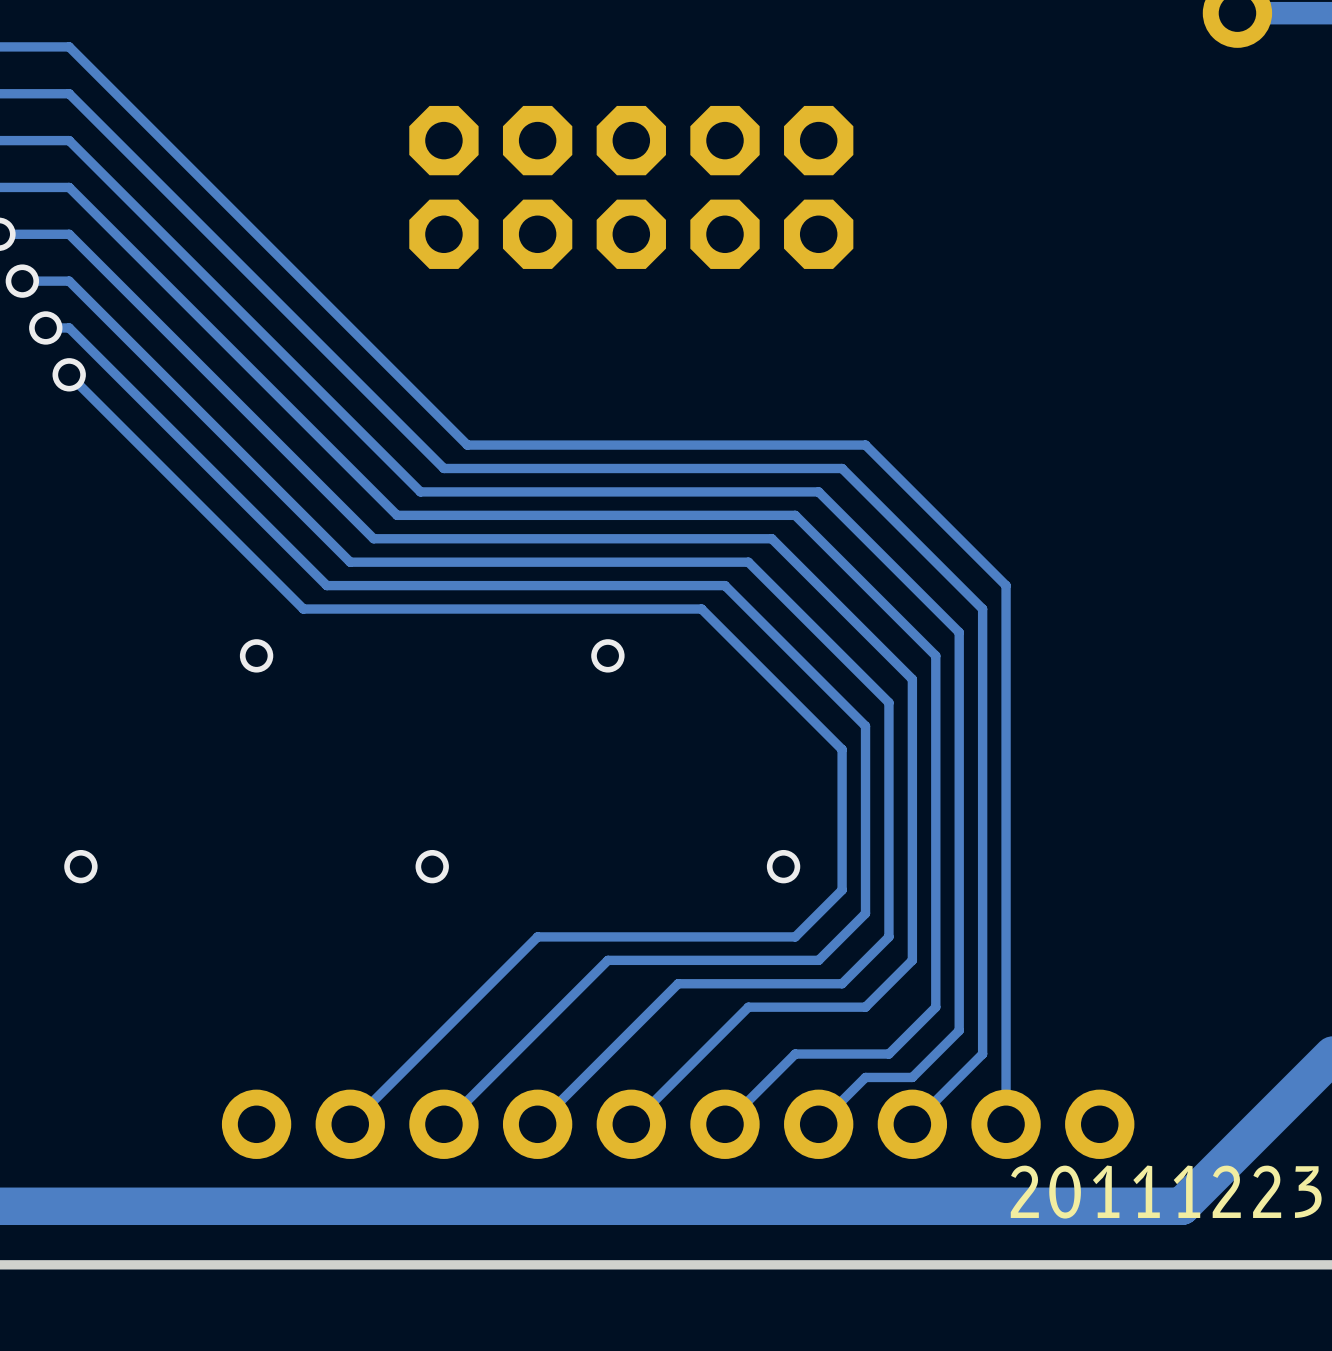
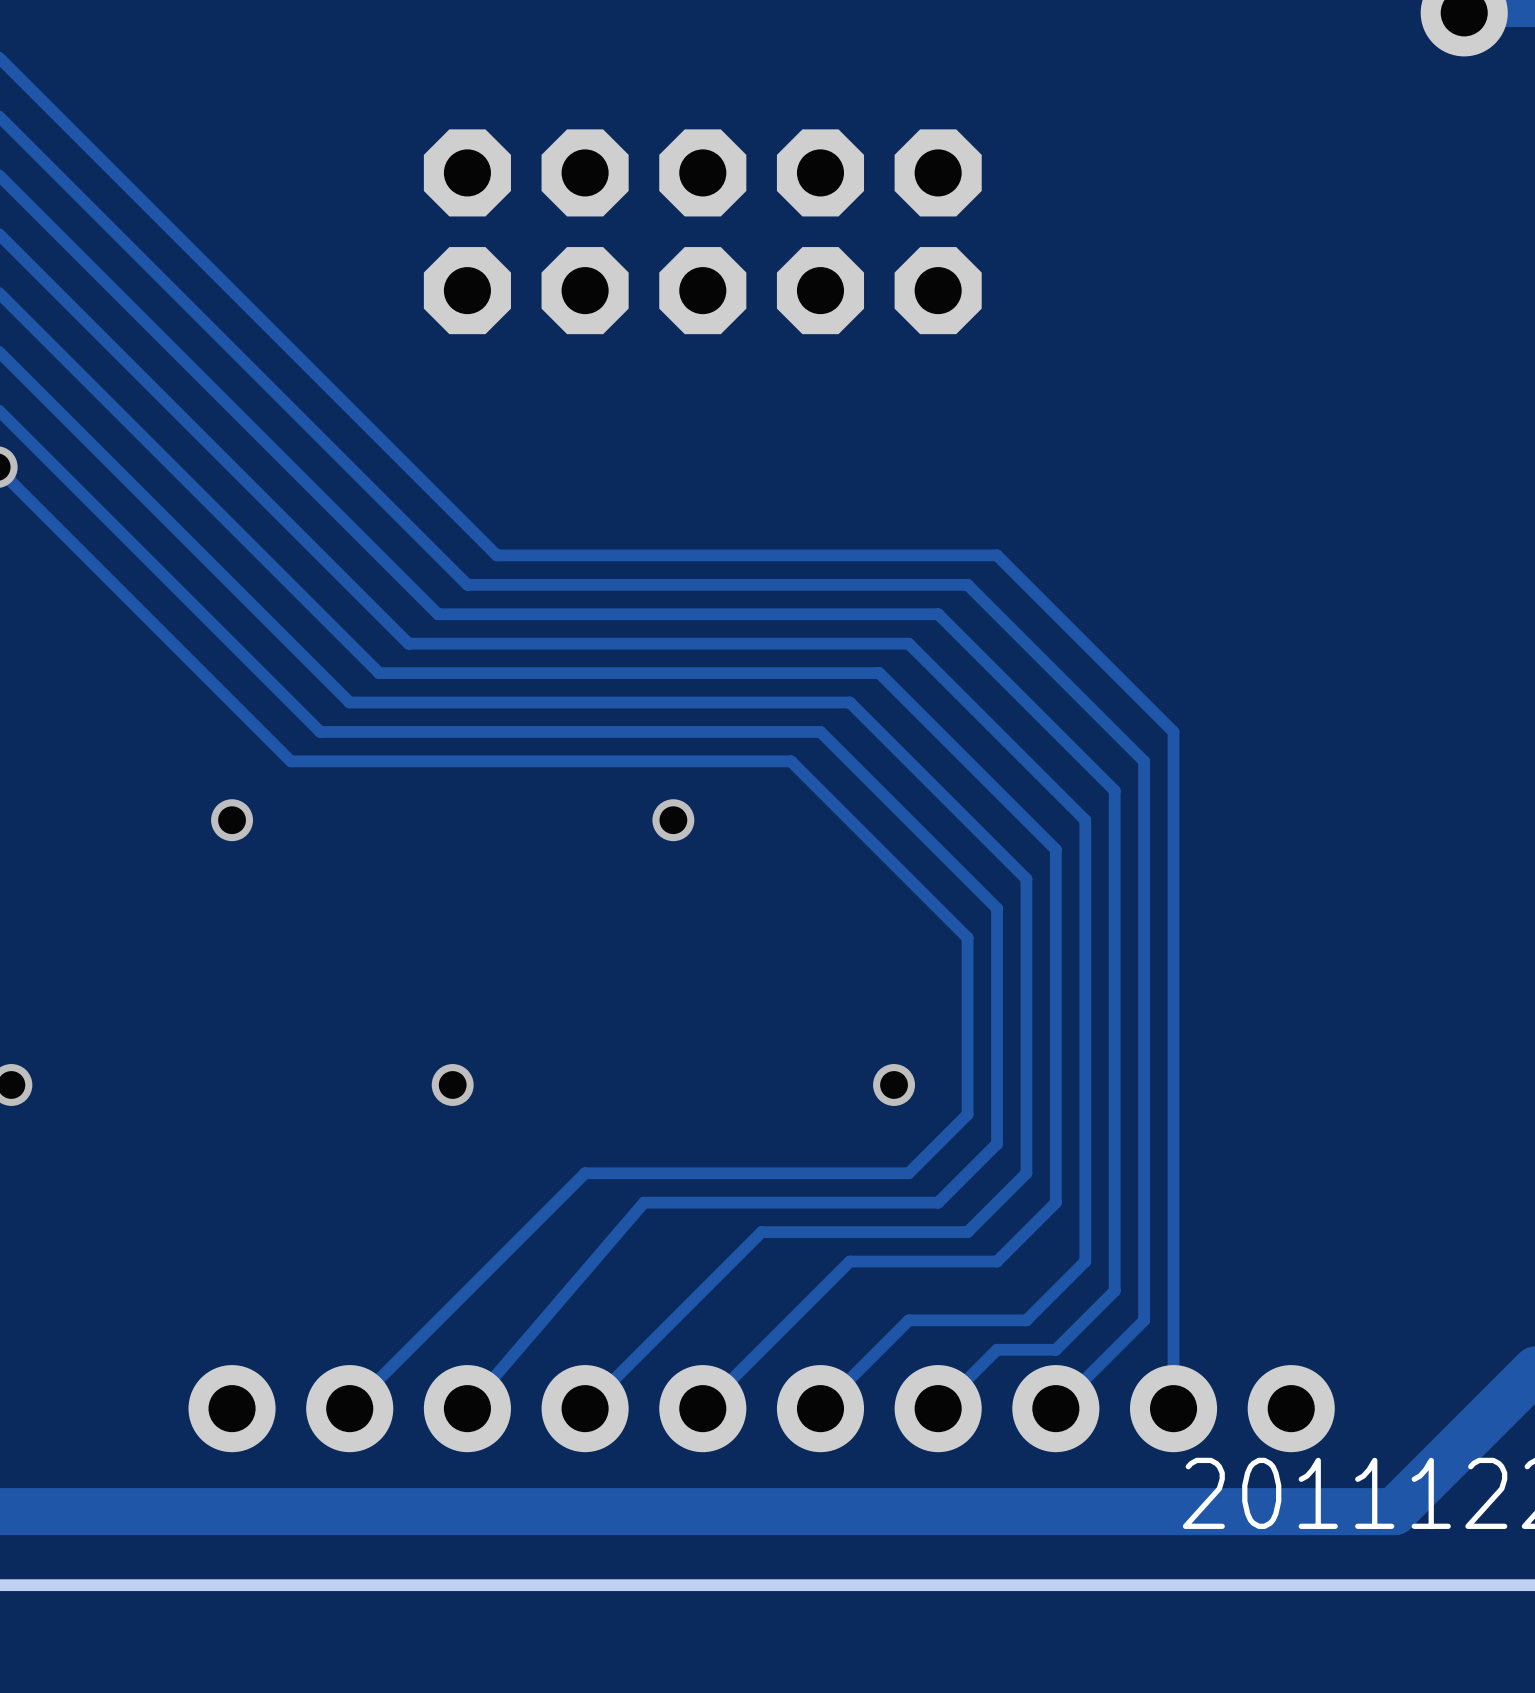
track: (607, 960) (443, 1124) -> (673, 1202) (643, 1202) (467, 1408)

